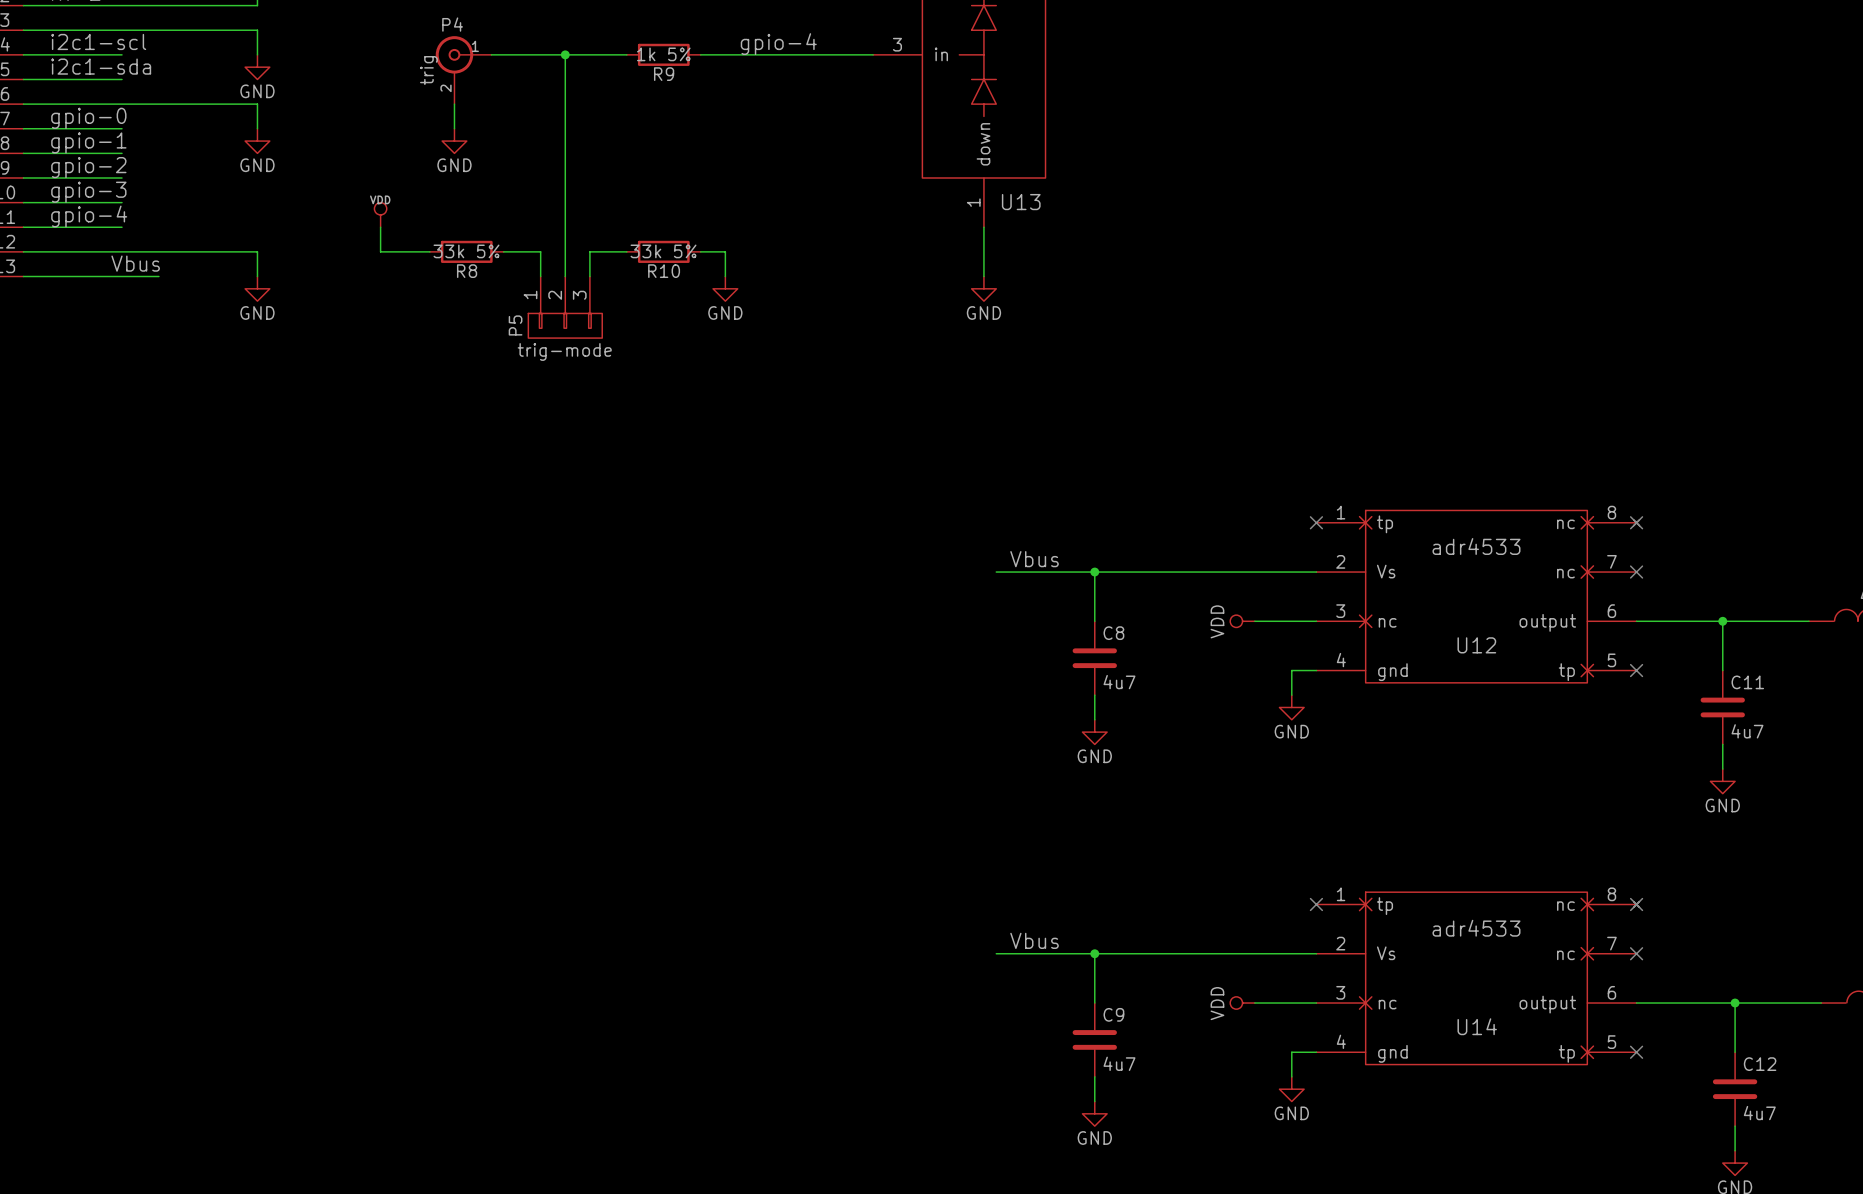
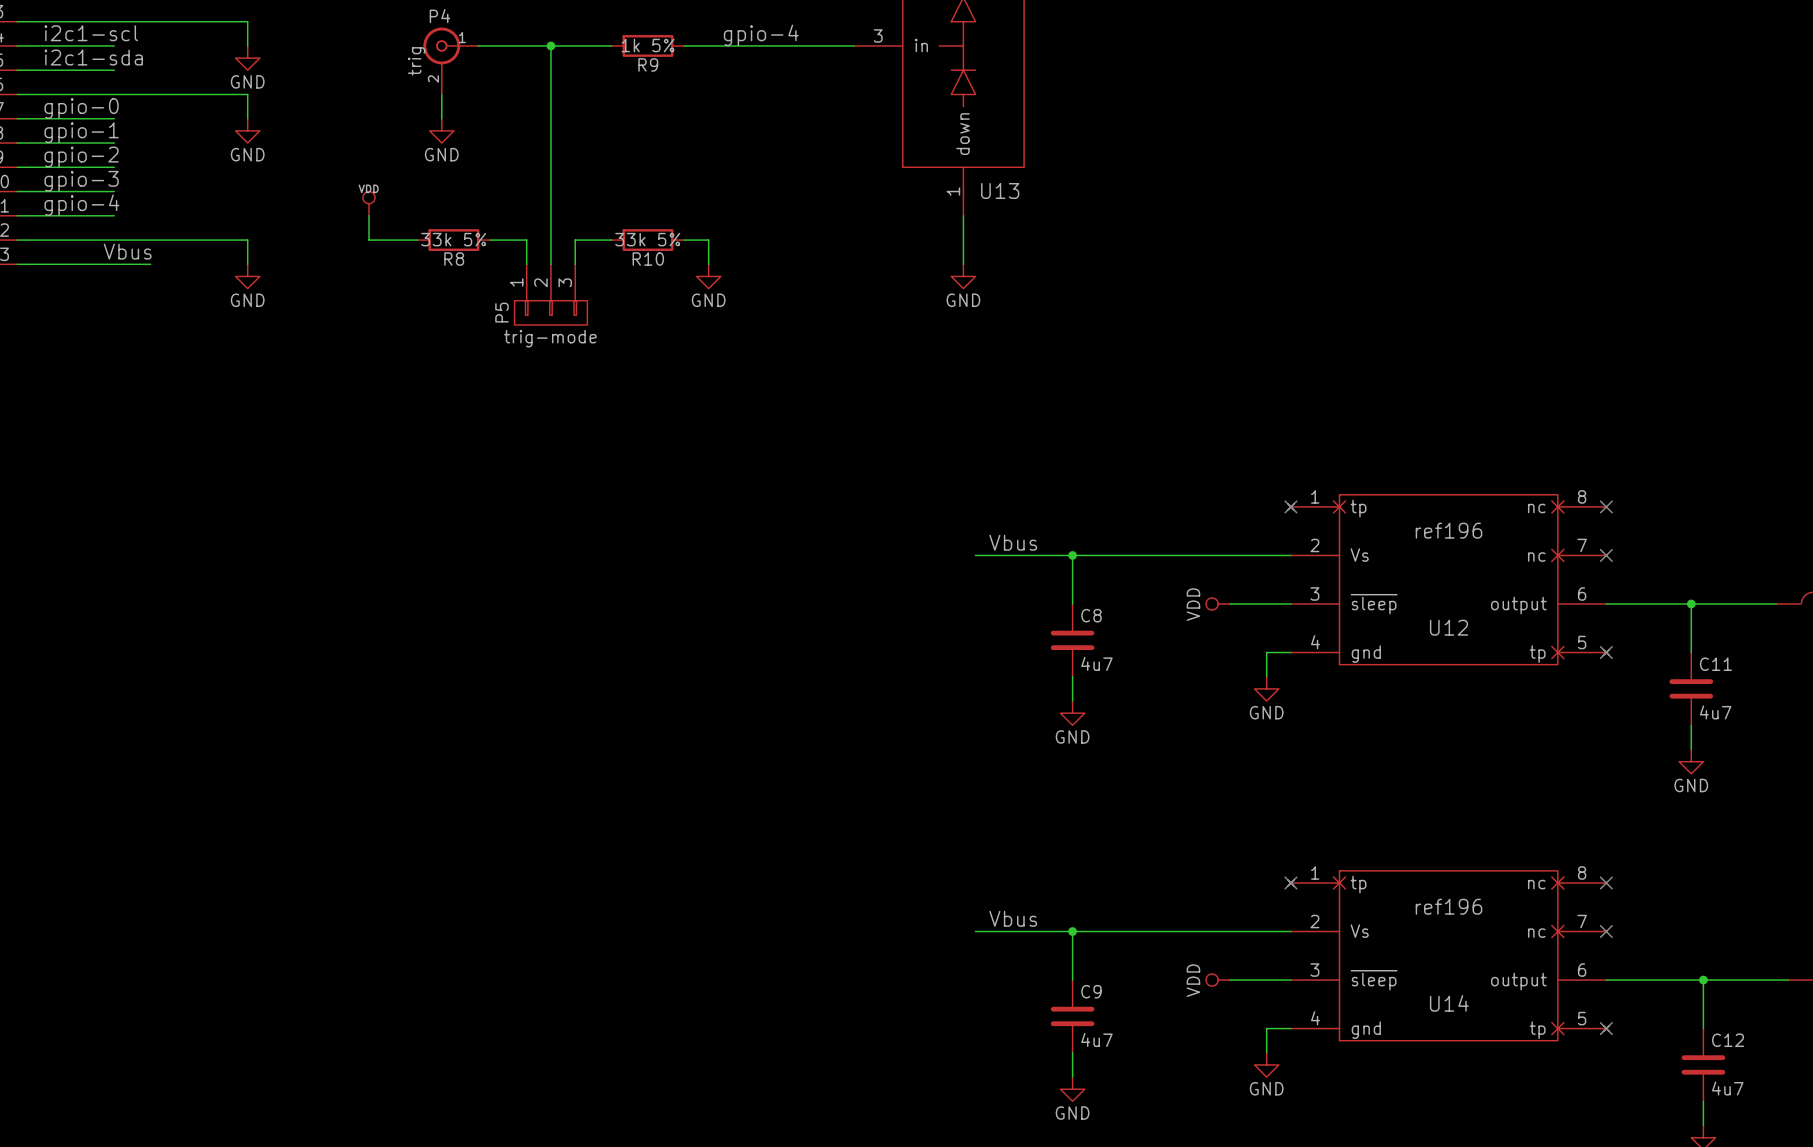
U12 symbol: [1316, 510, 1640, 683] -> [1288, 494, 1610, 665]
U12 value: adr4533 (1476, 546) -> ref196 (1449, 530)
U14 symbol: [1316, 892, 1640, 1065] -> [1288, 870, 1610, 1041]
U14 value: adr4533 (1476, 928) -> ref196 (1449, 906)

